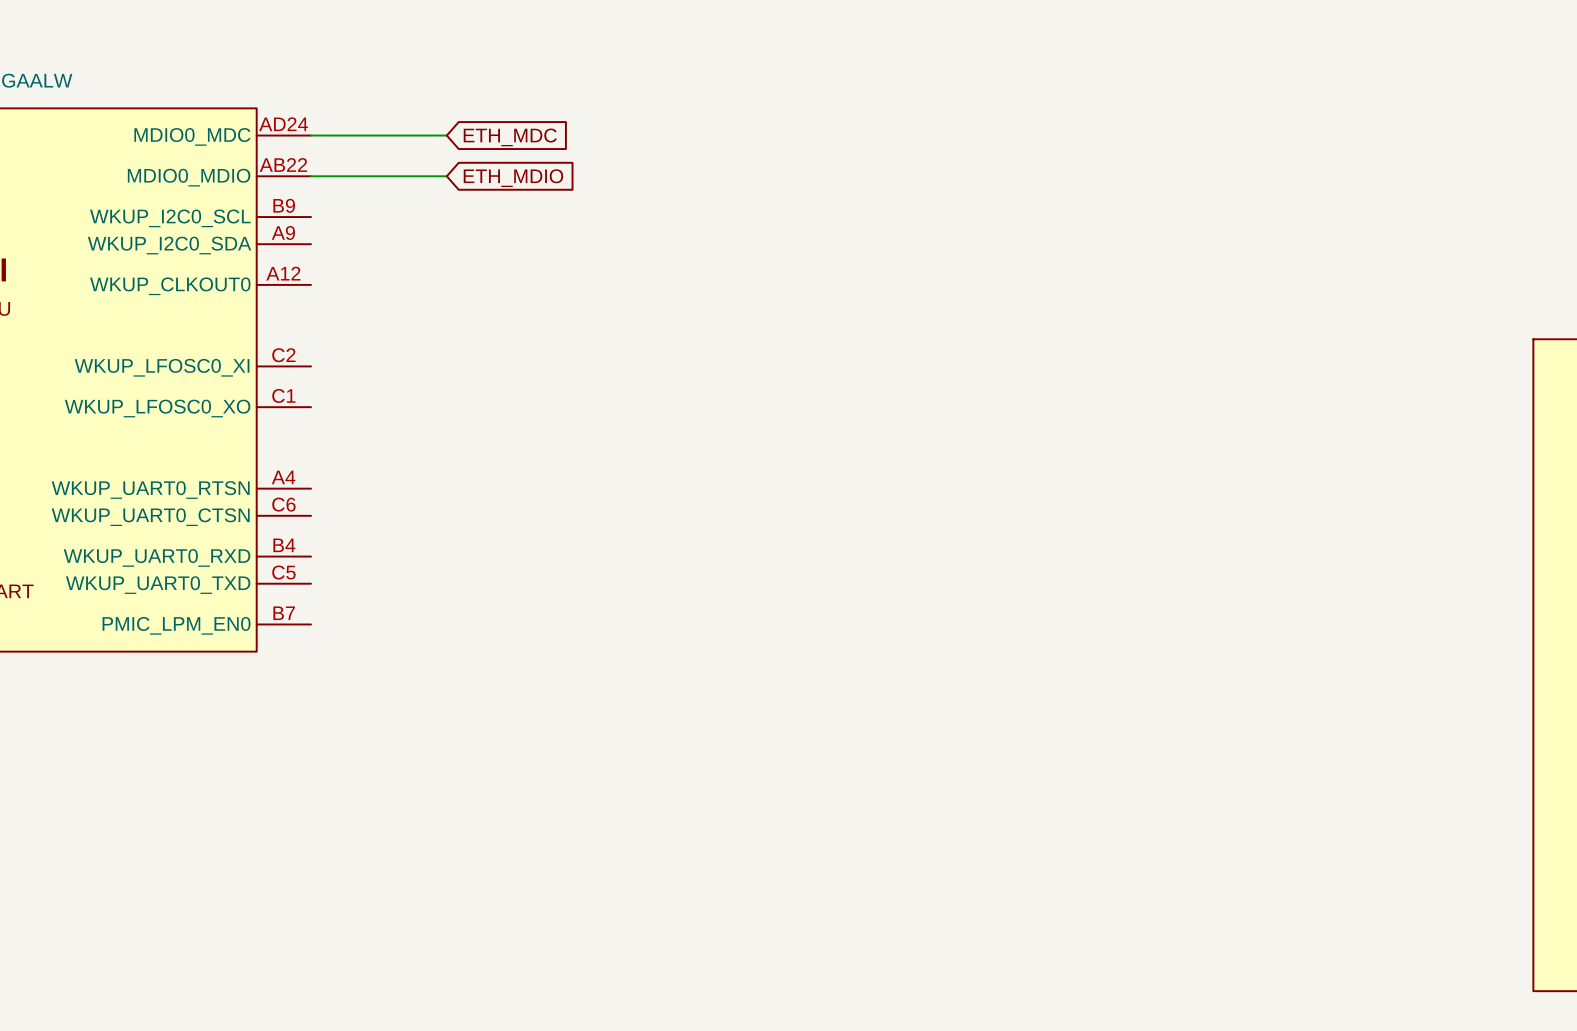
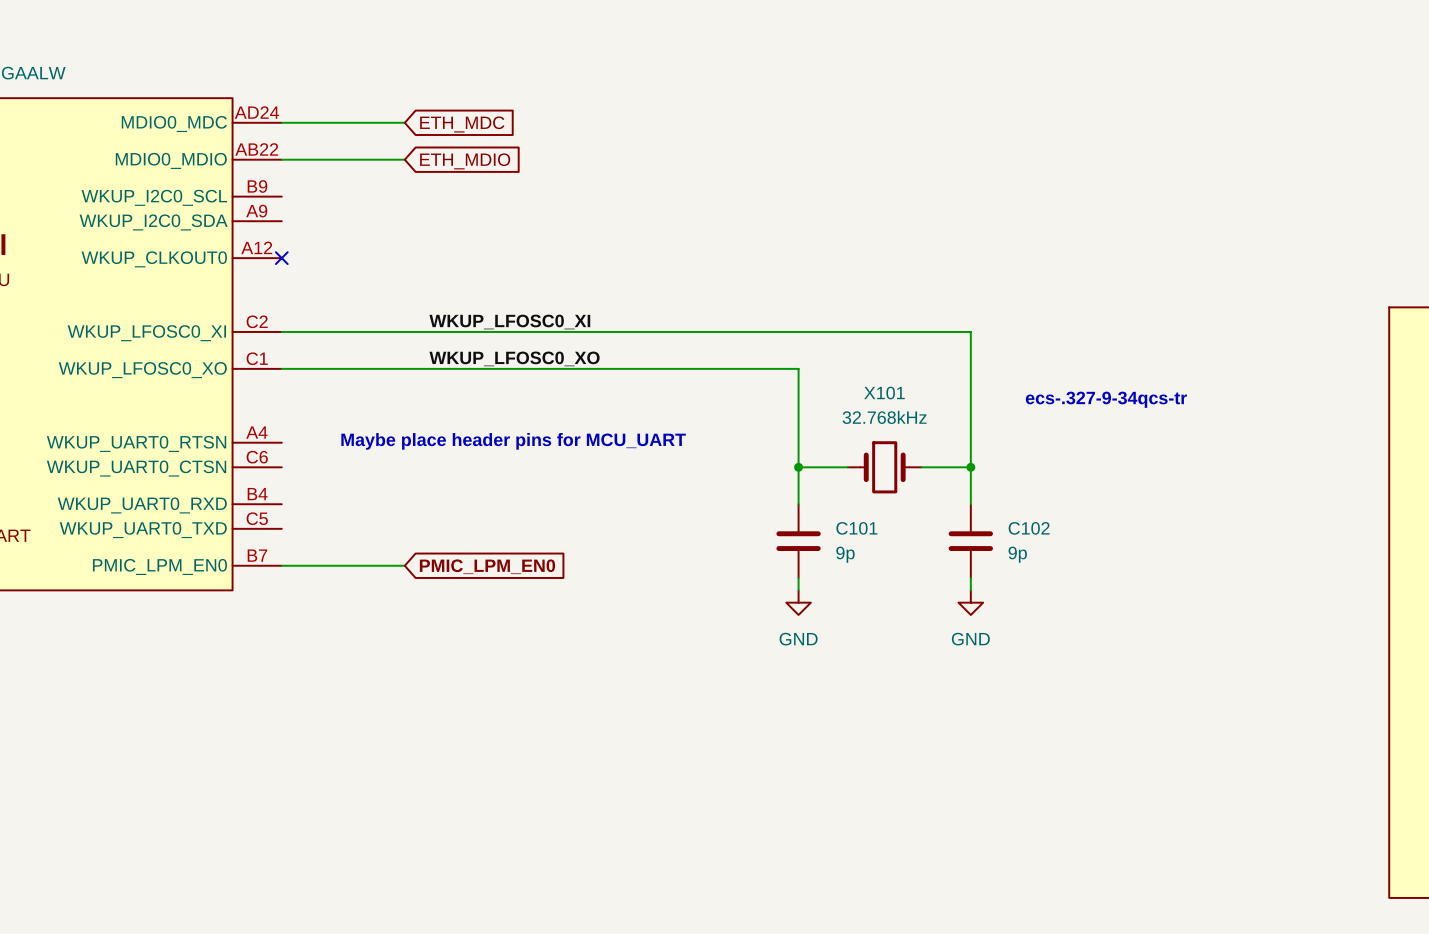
no-connect mark: none -> (281, 258)
label: none -> WKUP_LFOSC0_XI (509, 321)
wire: none -> (281, 331) (970, 331) (970, 504)
label: none -> WKUP_LFOSC0_XO (514, 358)
wire: none -> (281, 368) (798, 368) (798, 504)
text: none -> ecs-.327-9-34qcs-tr (1106, 399)
text: none -> Maybe place header pins for MCU_UART (513, 441)
wire: none -> (798, 467) (847, 467)
junction: none -> (798, 467)
X101: none -> 32.768kHz (884, 467)
wire: none -> (921, 467) (970, 467)
junction: none -> (970, 467)
C101: none -> 9p (798, 541)
C102: none -> 9p (970, 541)
wire: none -> (281, 565) (404, 565)
global label: none -> PMIC_LPM_EN0 (487, 566)
wire: none -> (798, 578) (798, 590)
wire: none -> (970, 578) (970, 590)
power symbol: none -> GND (798, 602)
power symbol: none -> GND (970, 602)

